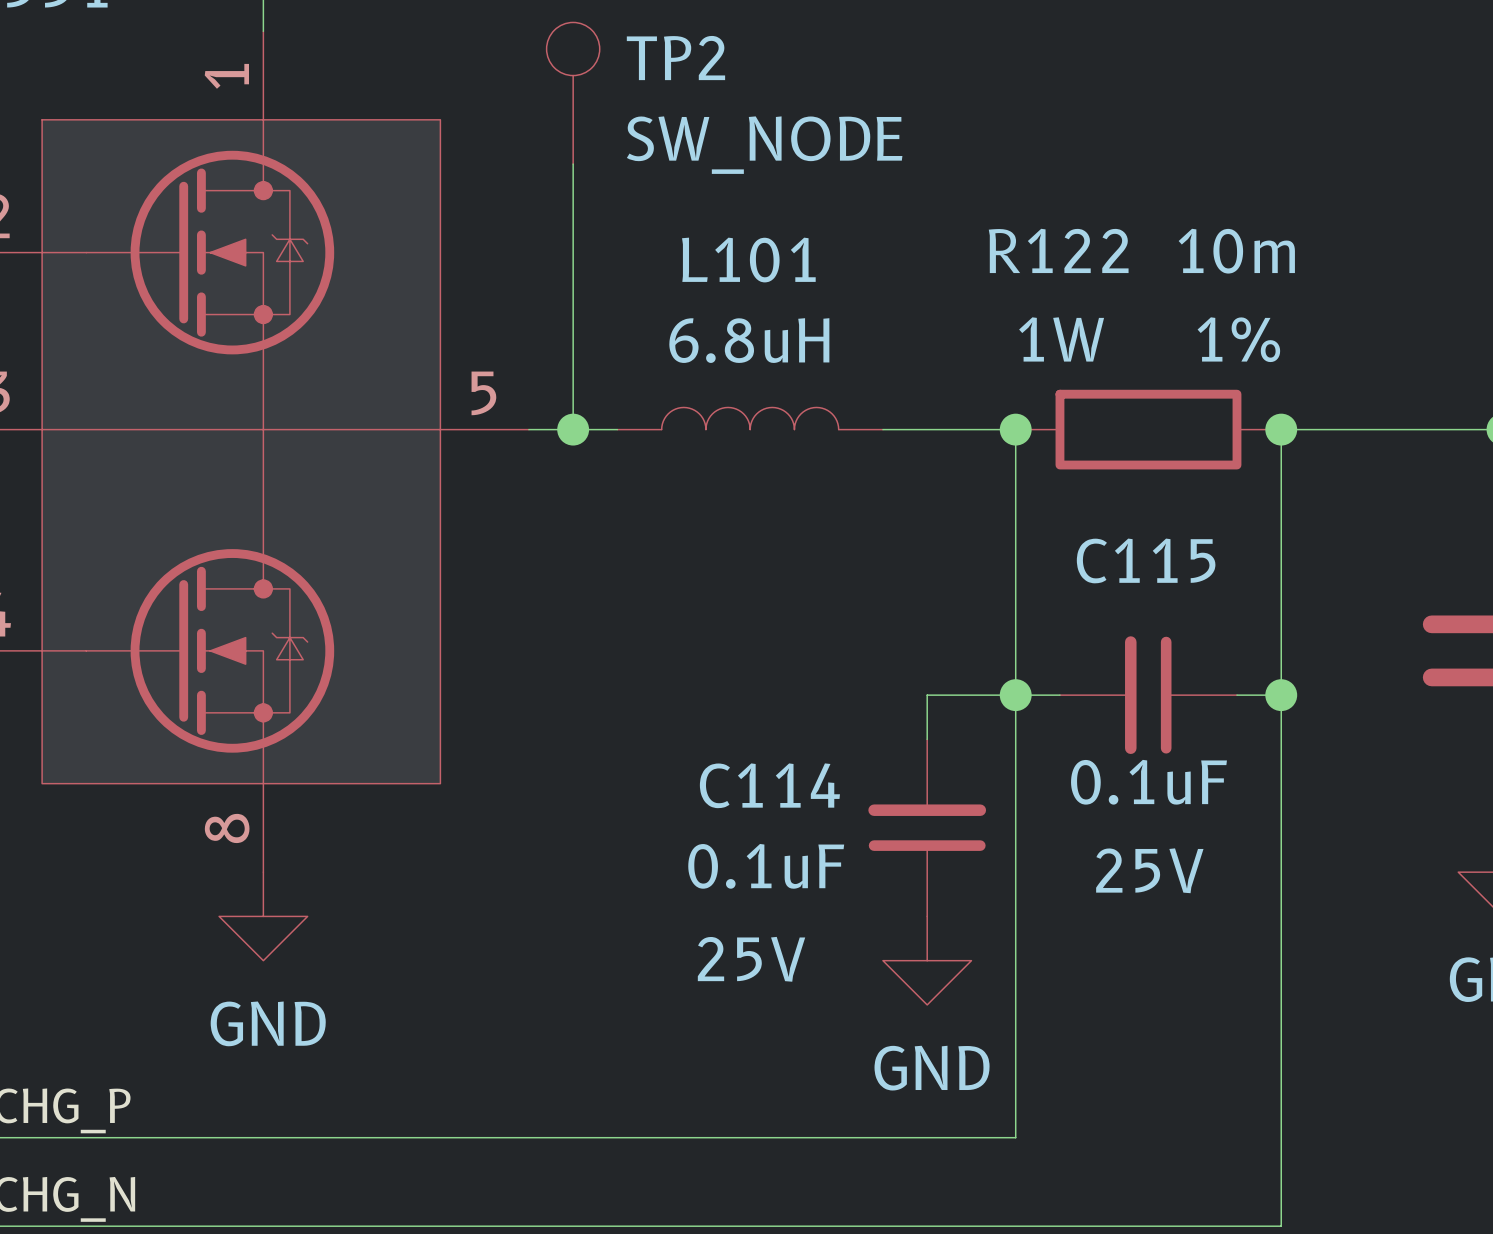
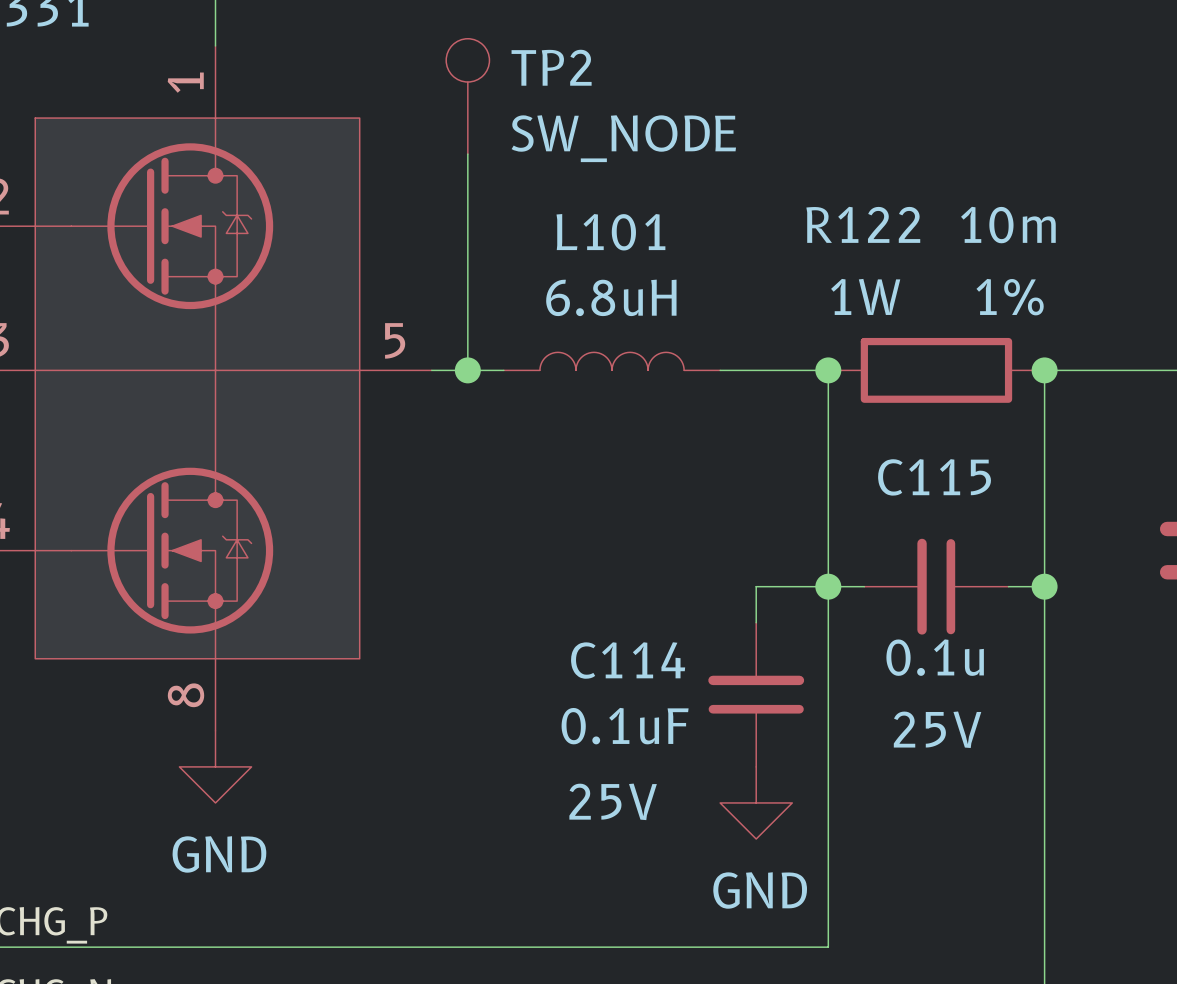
C115 value: 0.1uF (1148, 782) -> 0.1u (935, 657)

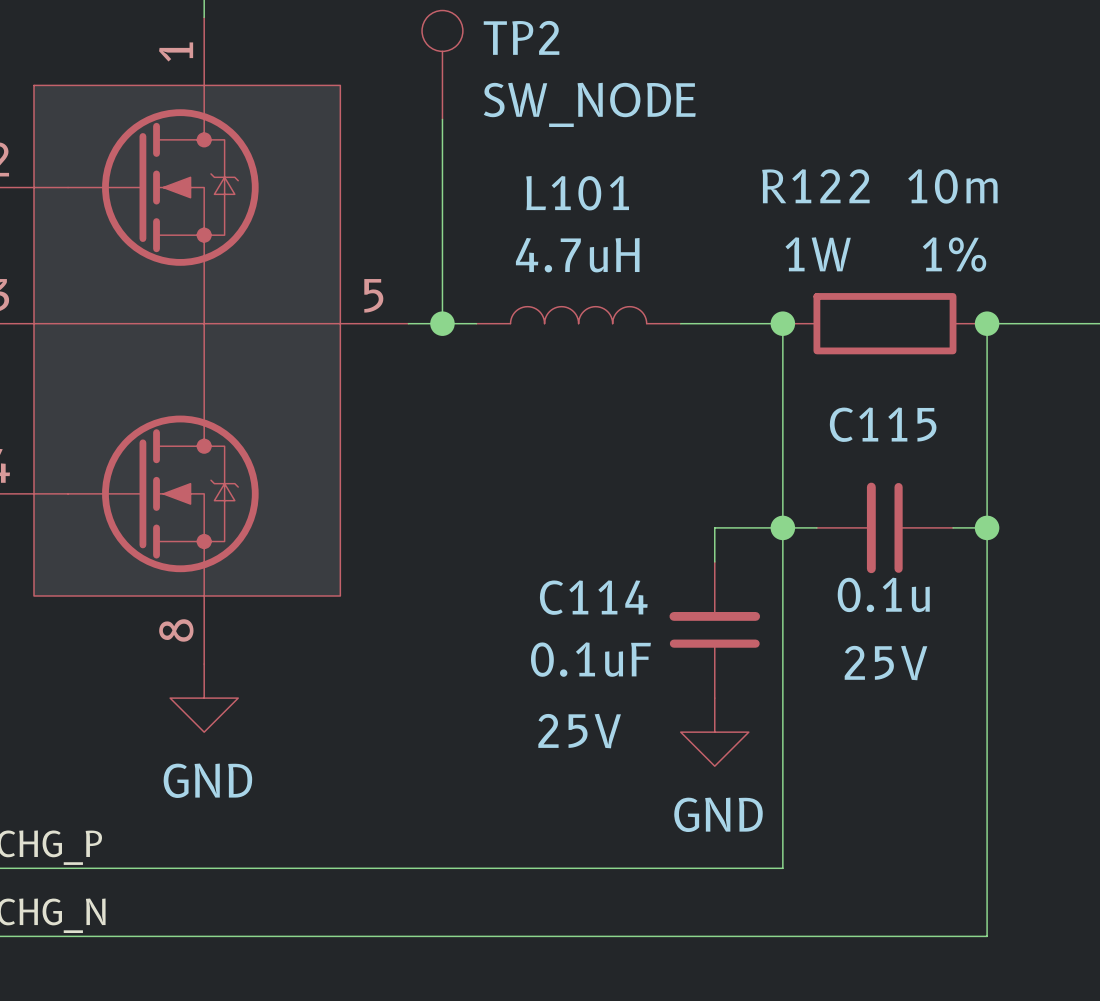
L101 value: 6.8uH (611, 297) -> 4.7uH (577, 255)

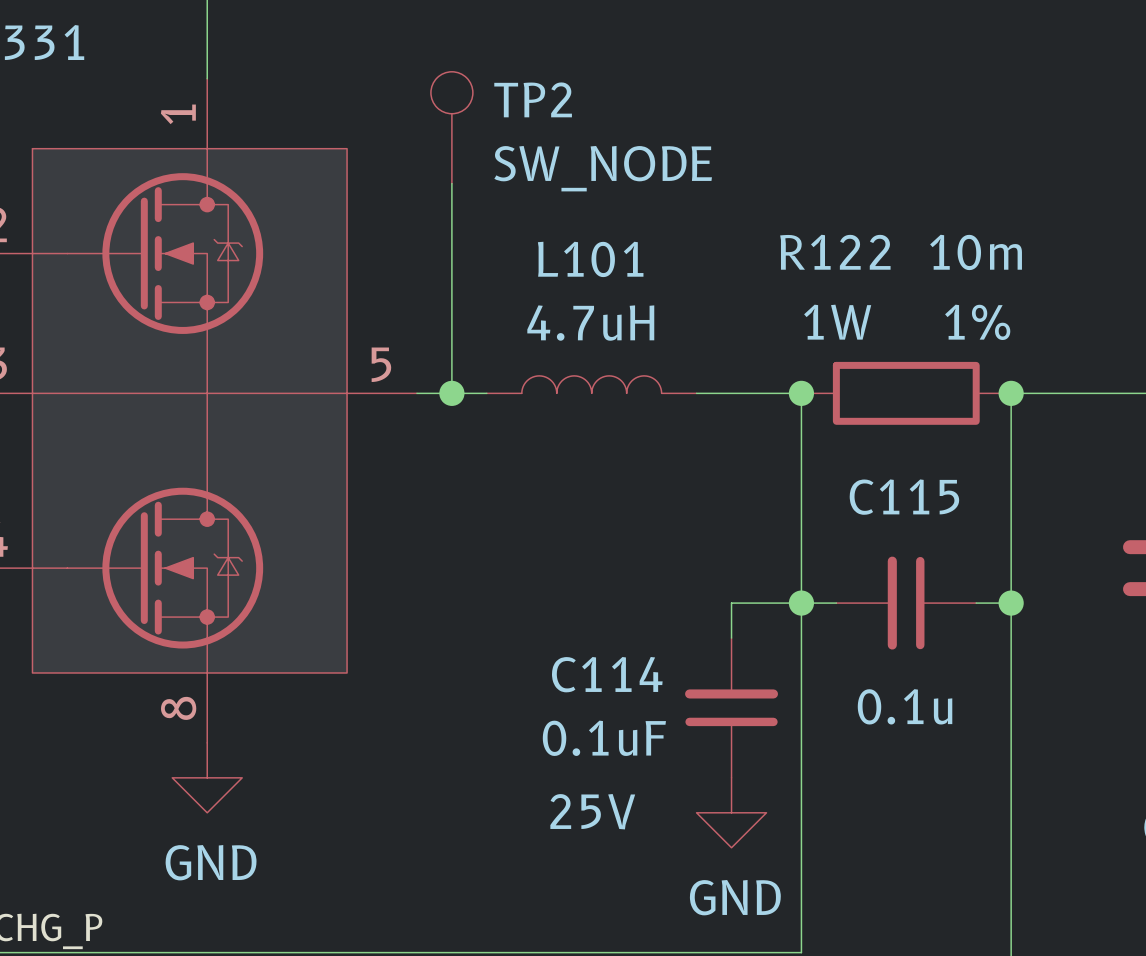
C115 value position: 0.1u (883, 594) -> 0.1u (905, 706)
C115 text: 25V (885, 663) -> none

